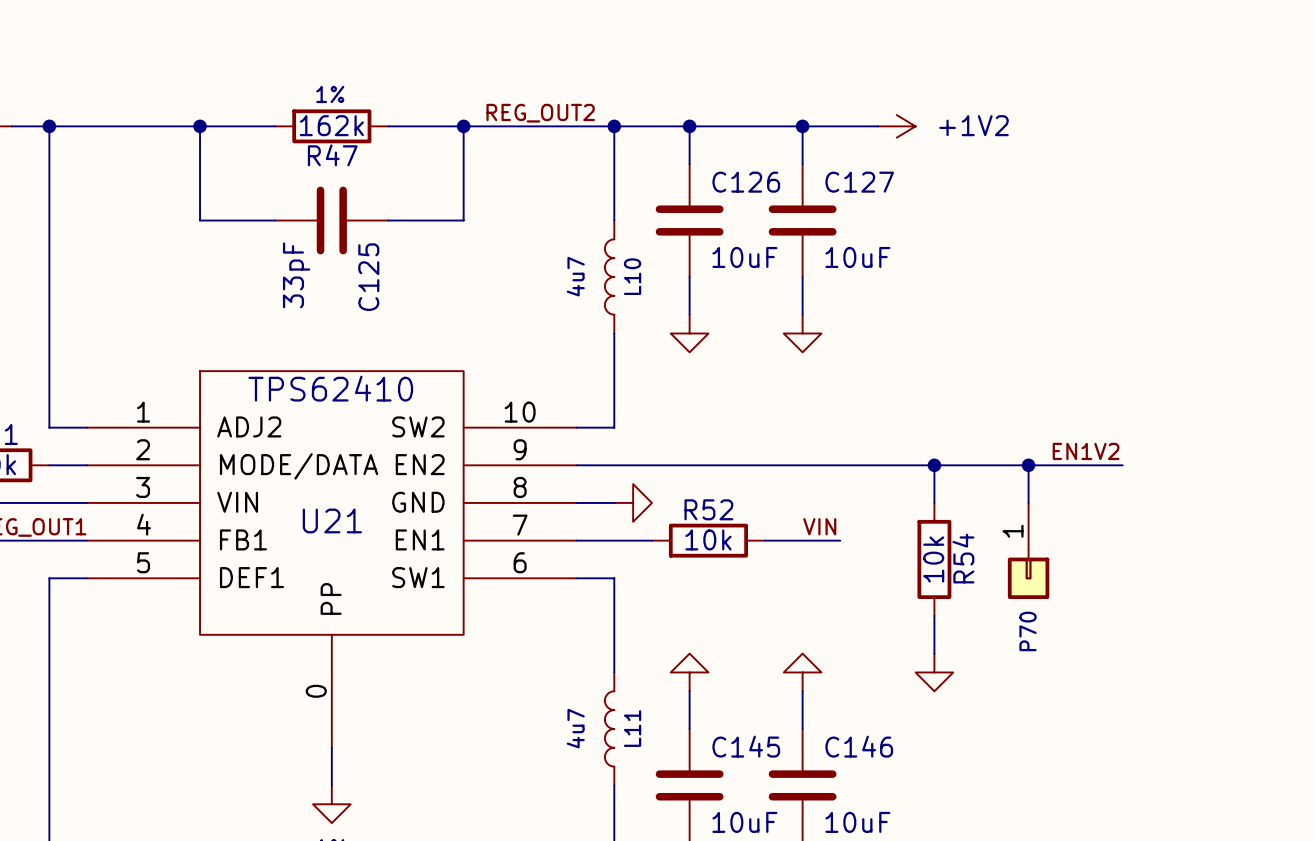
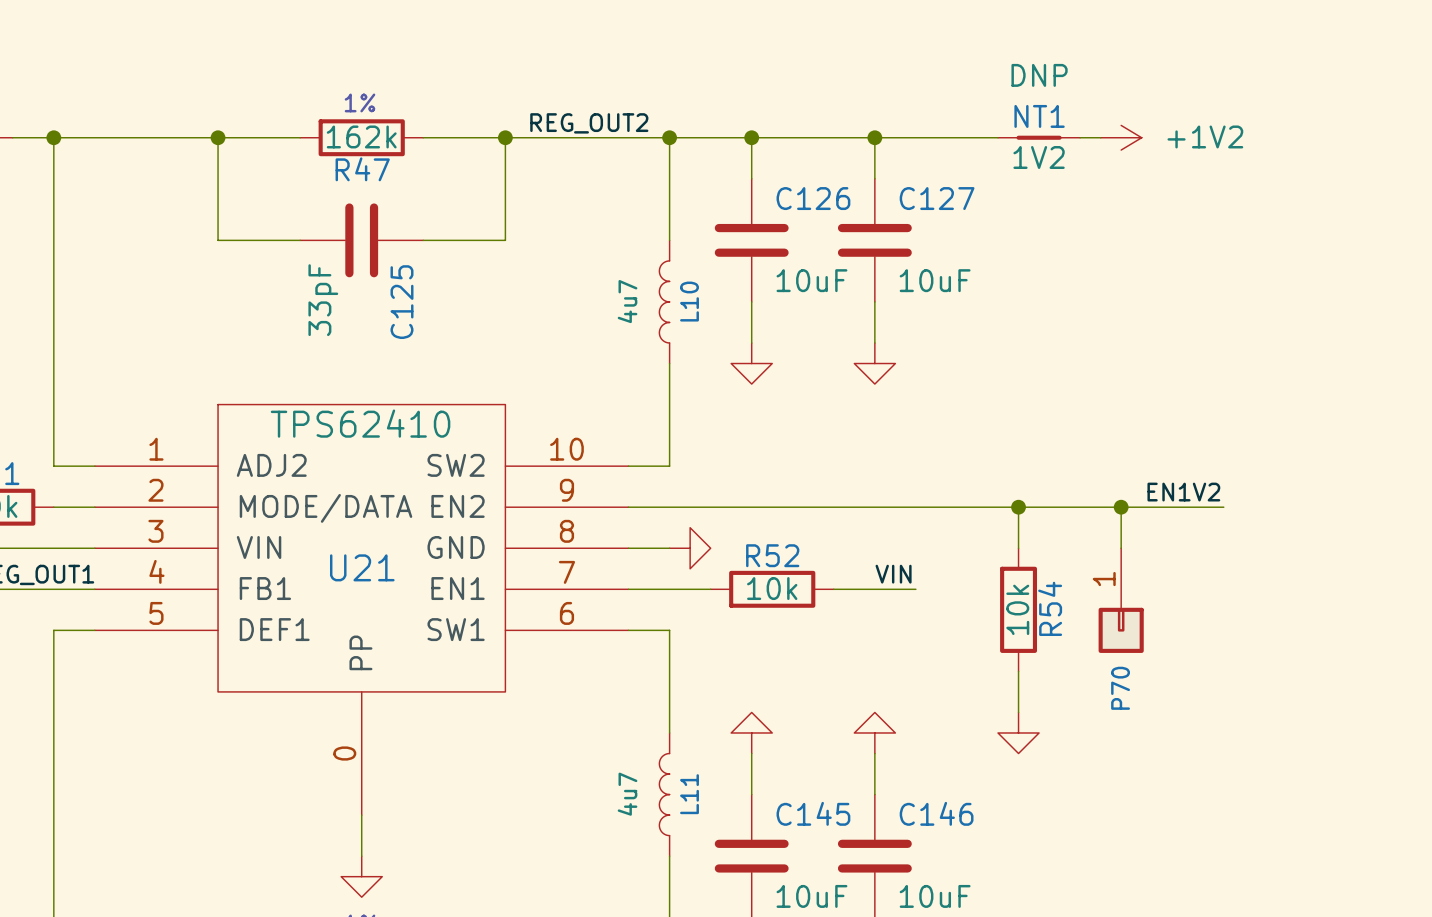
power symbol position: +1V2 (896, 126) -> +1V2 (1121, 137)
NT1: none -> 1V2 (1039, 137)
wire: none -> (1080, 137) (1100, 137)

